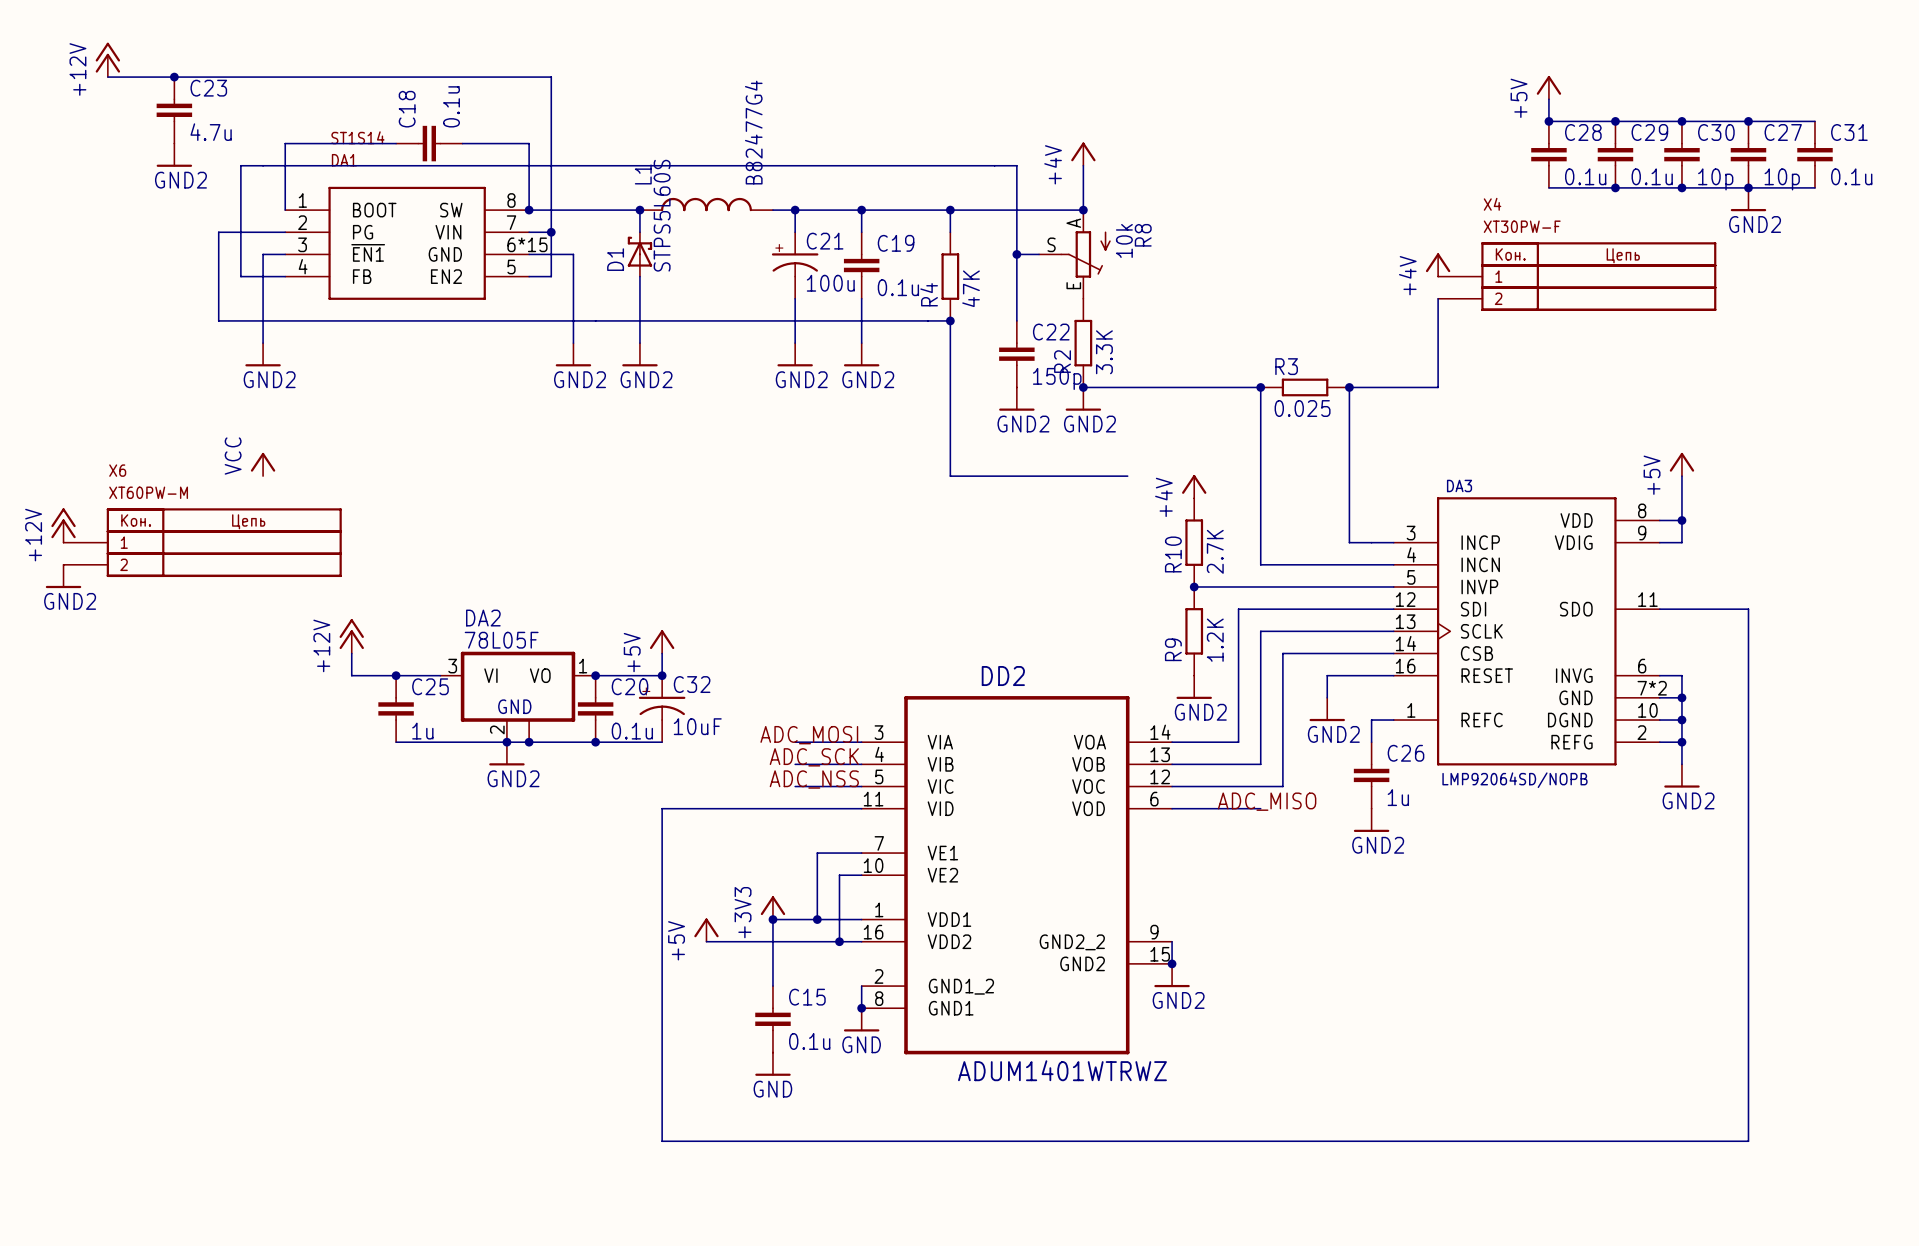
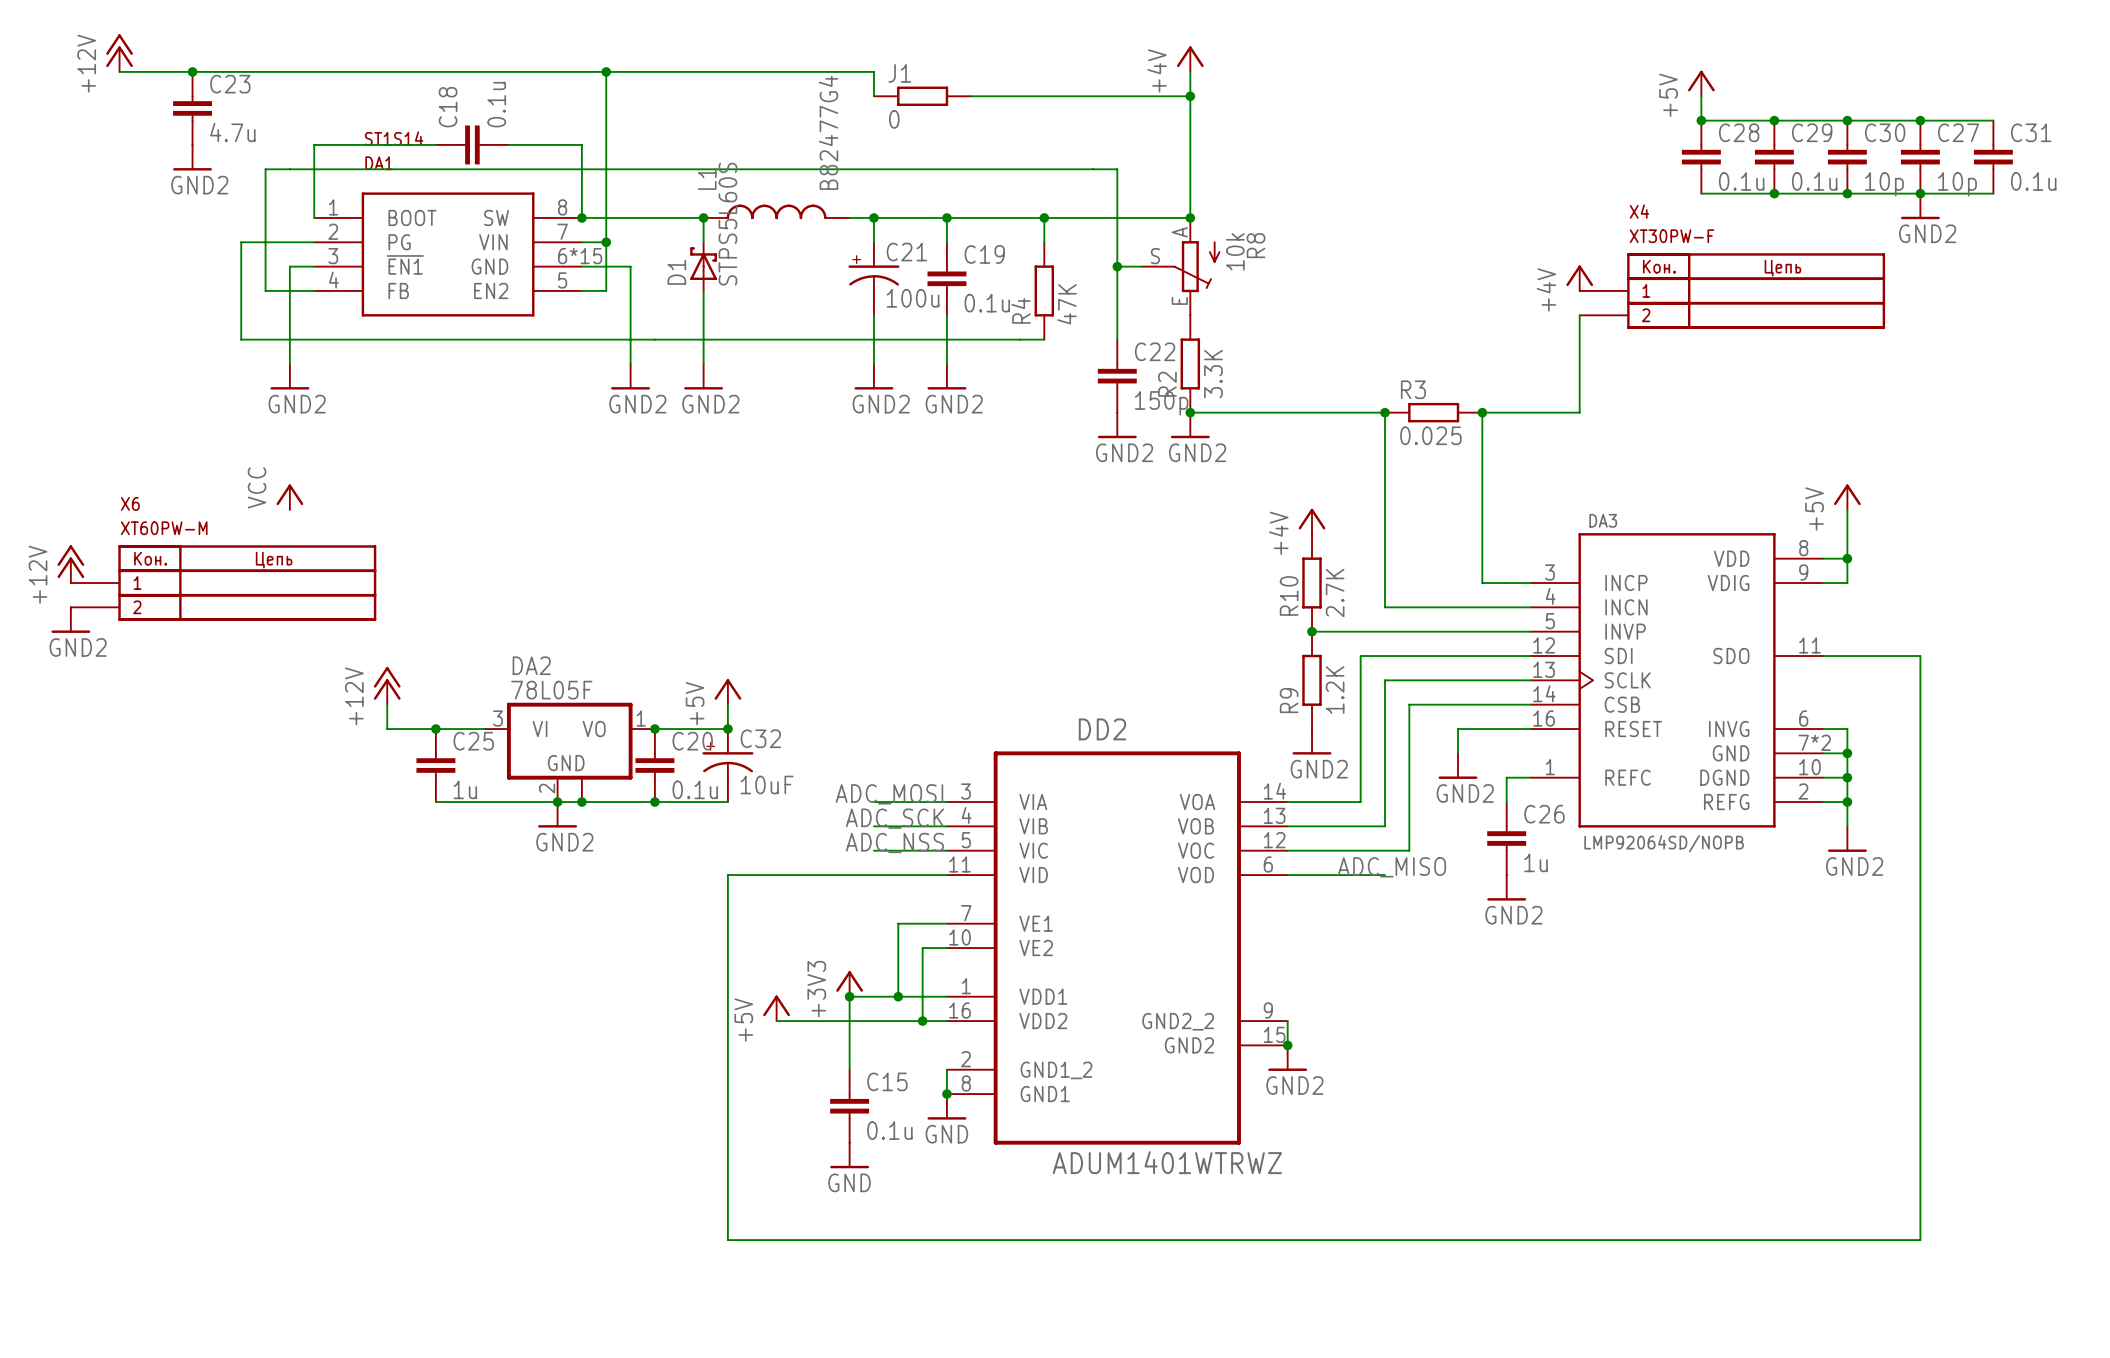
wire: none -> (606, 71) (873, 71) (873, 96)
junction: none -> (606, 71)
wire: none -> (1190, 71) (1190, 169)
J1: none -> 0 (922, 96)
wire: none -> (971, 96) (1190, 96)
junction: none -> (1190, 96)
power symbol position: +4V (1083, 154) -> +4V (1190, 59)
wire: (950, 320) (950, 476) (1127, 476) -> none
junction: (950, 320) -> none

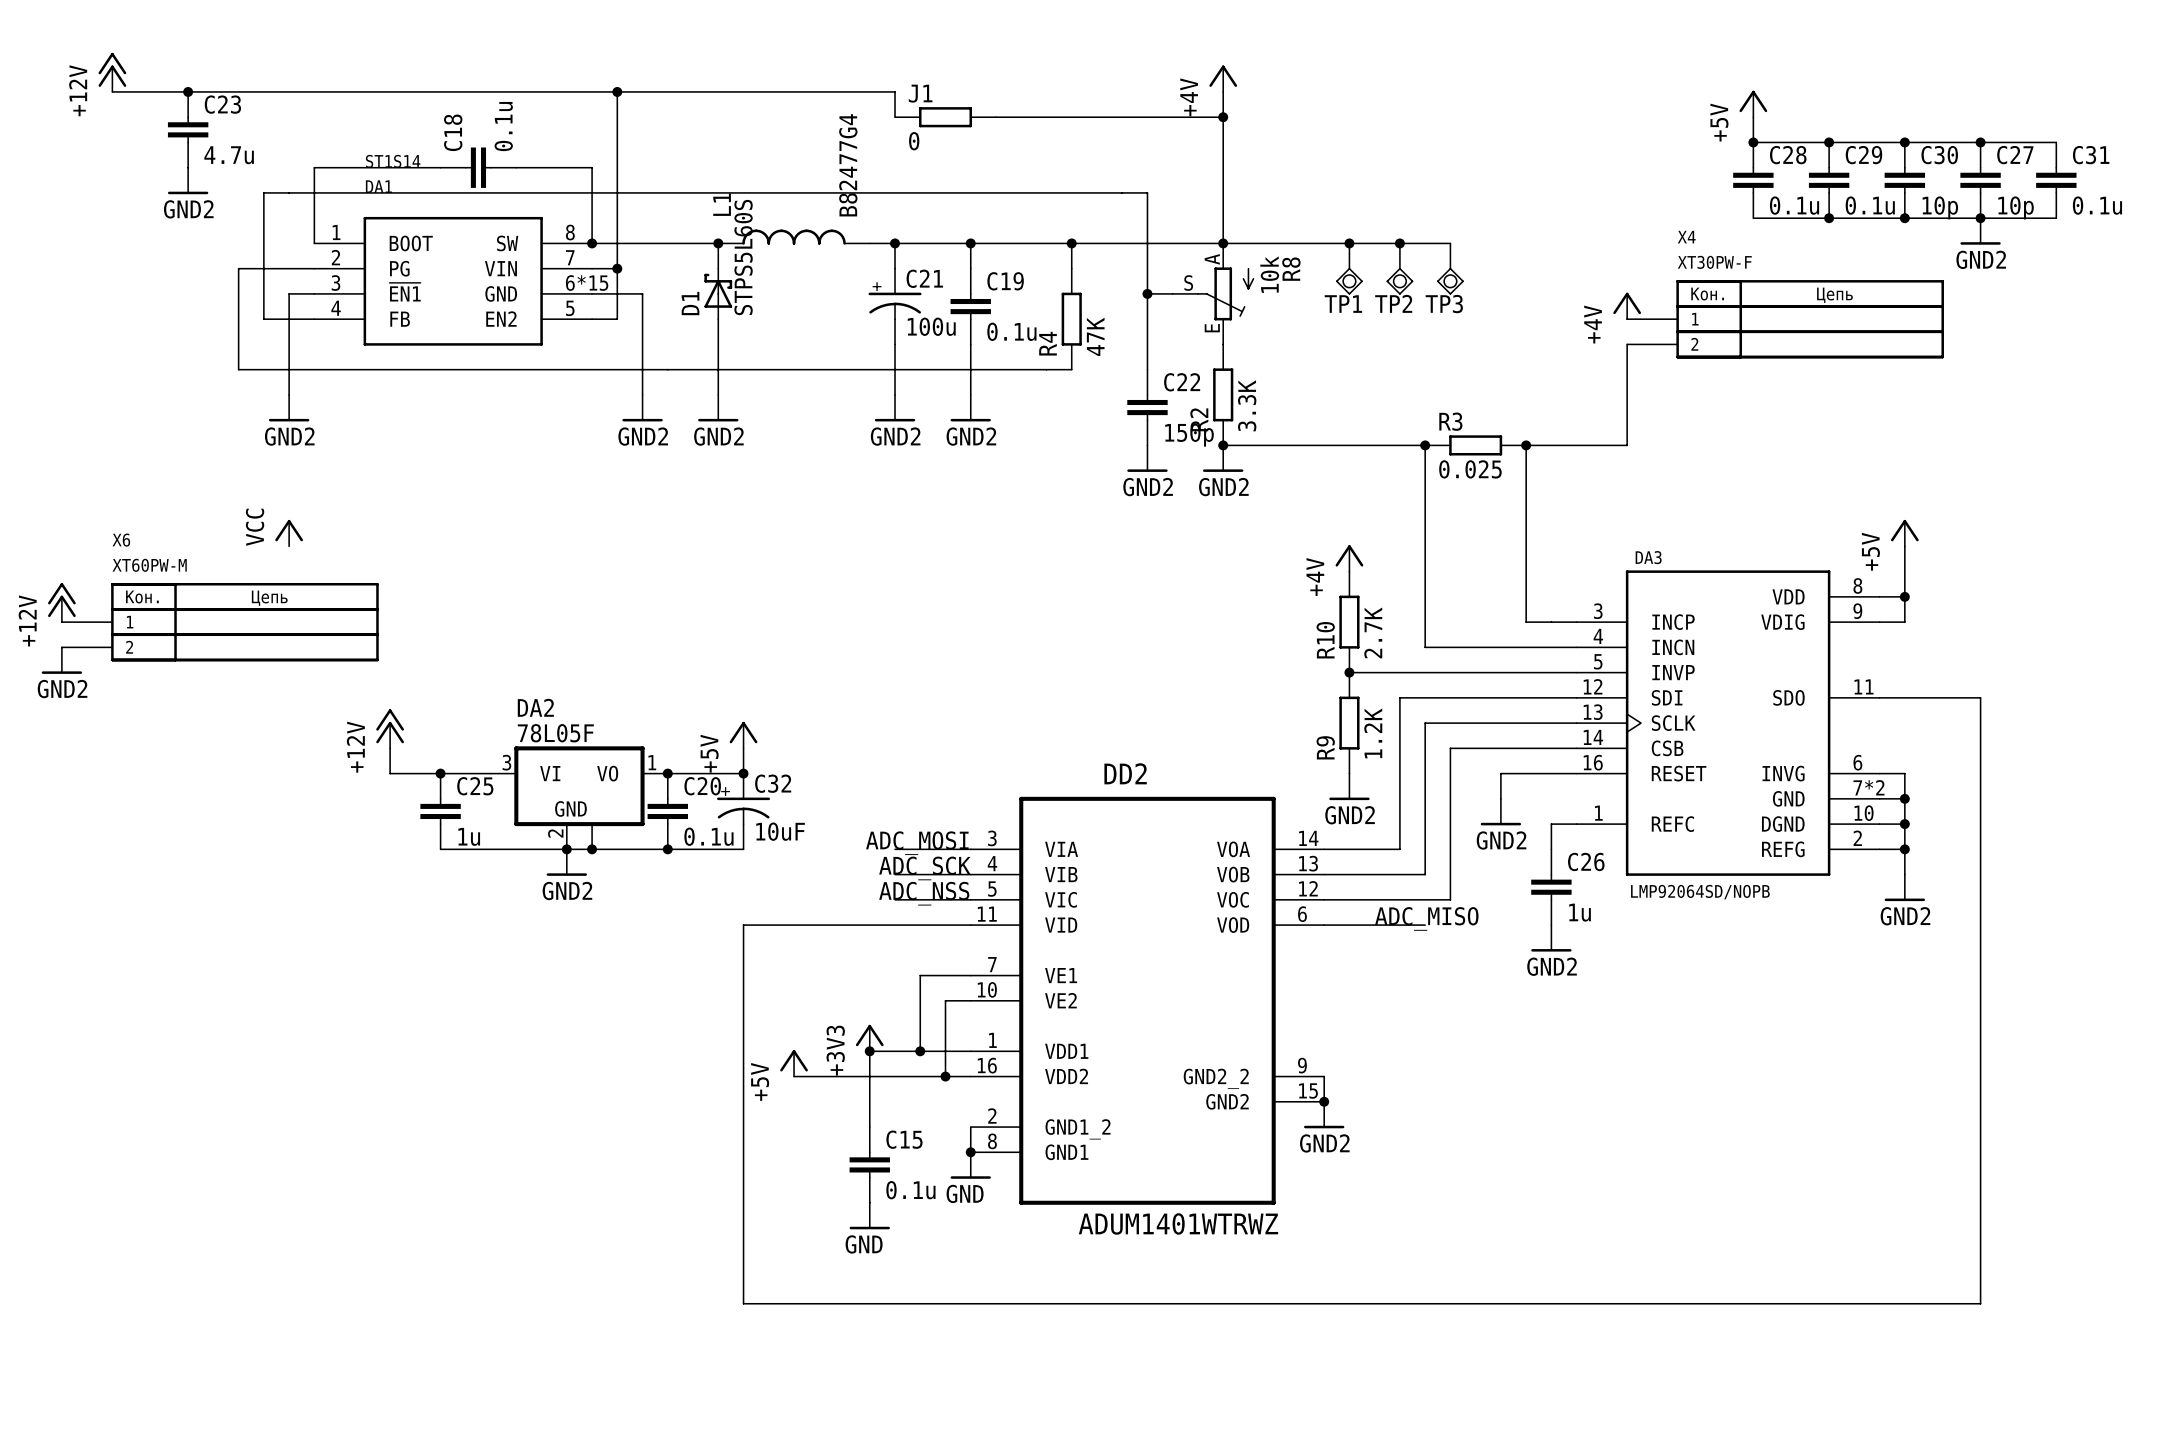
wire: none -> (1223, 243) (1450, 243)
junction: none -> (1349, 243)
junction: none -> (1399, 243)
TP1: none -> (1349, 269)
TP2: none -> (1399, 269)
TP3: none -> (1450, 269)

